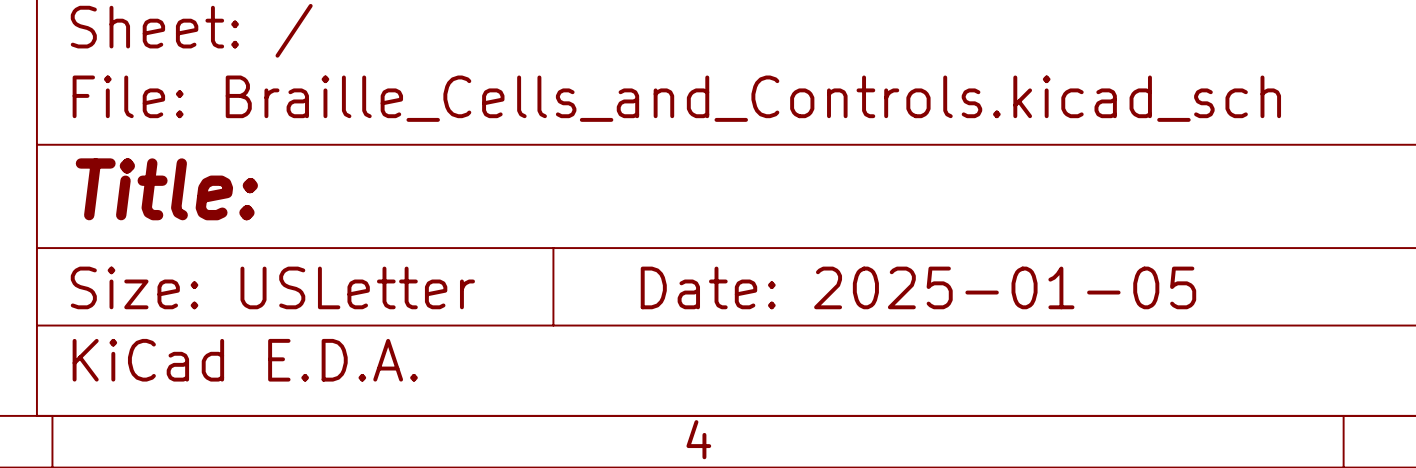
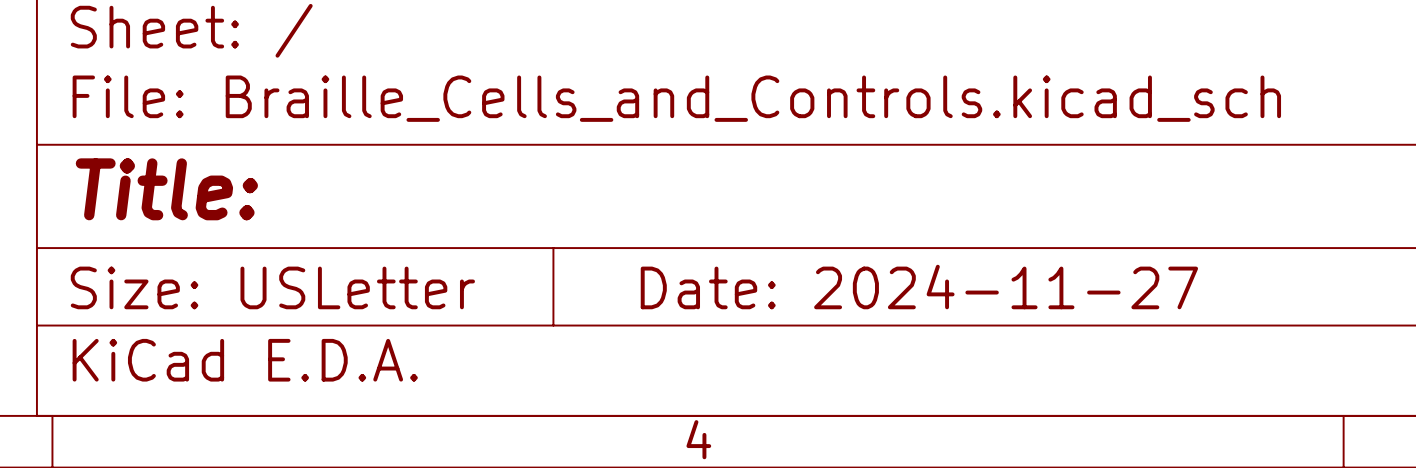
title block: Date: 2025-01-05 (918, 287) -> Date: 2024-11-27 (919, 287)

